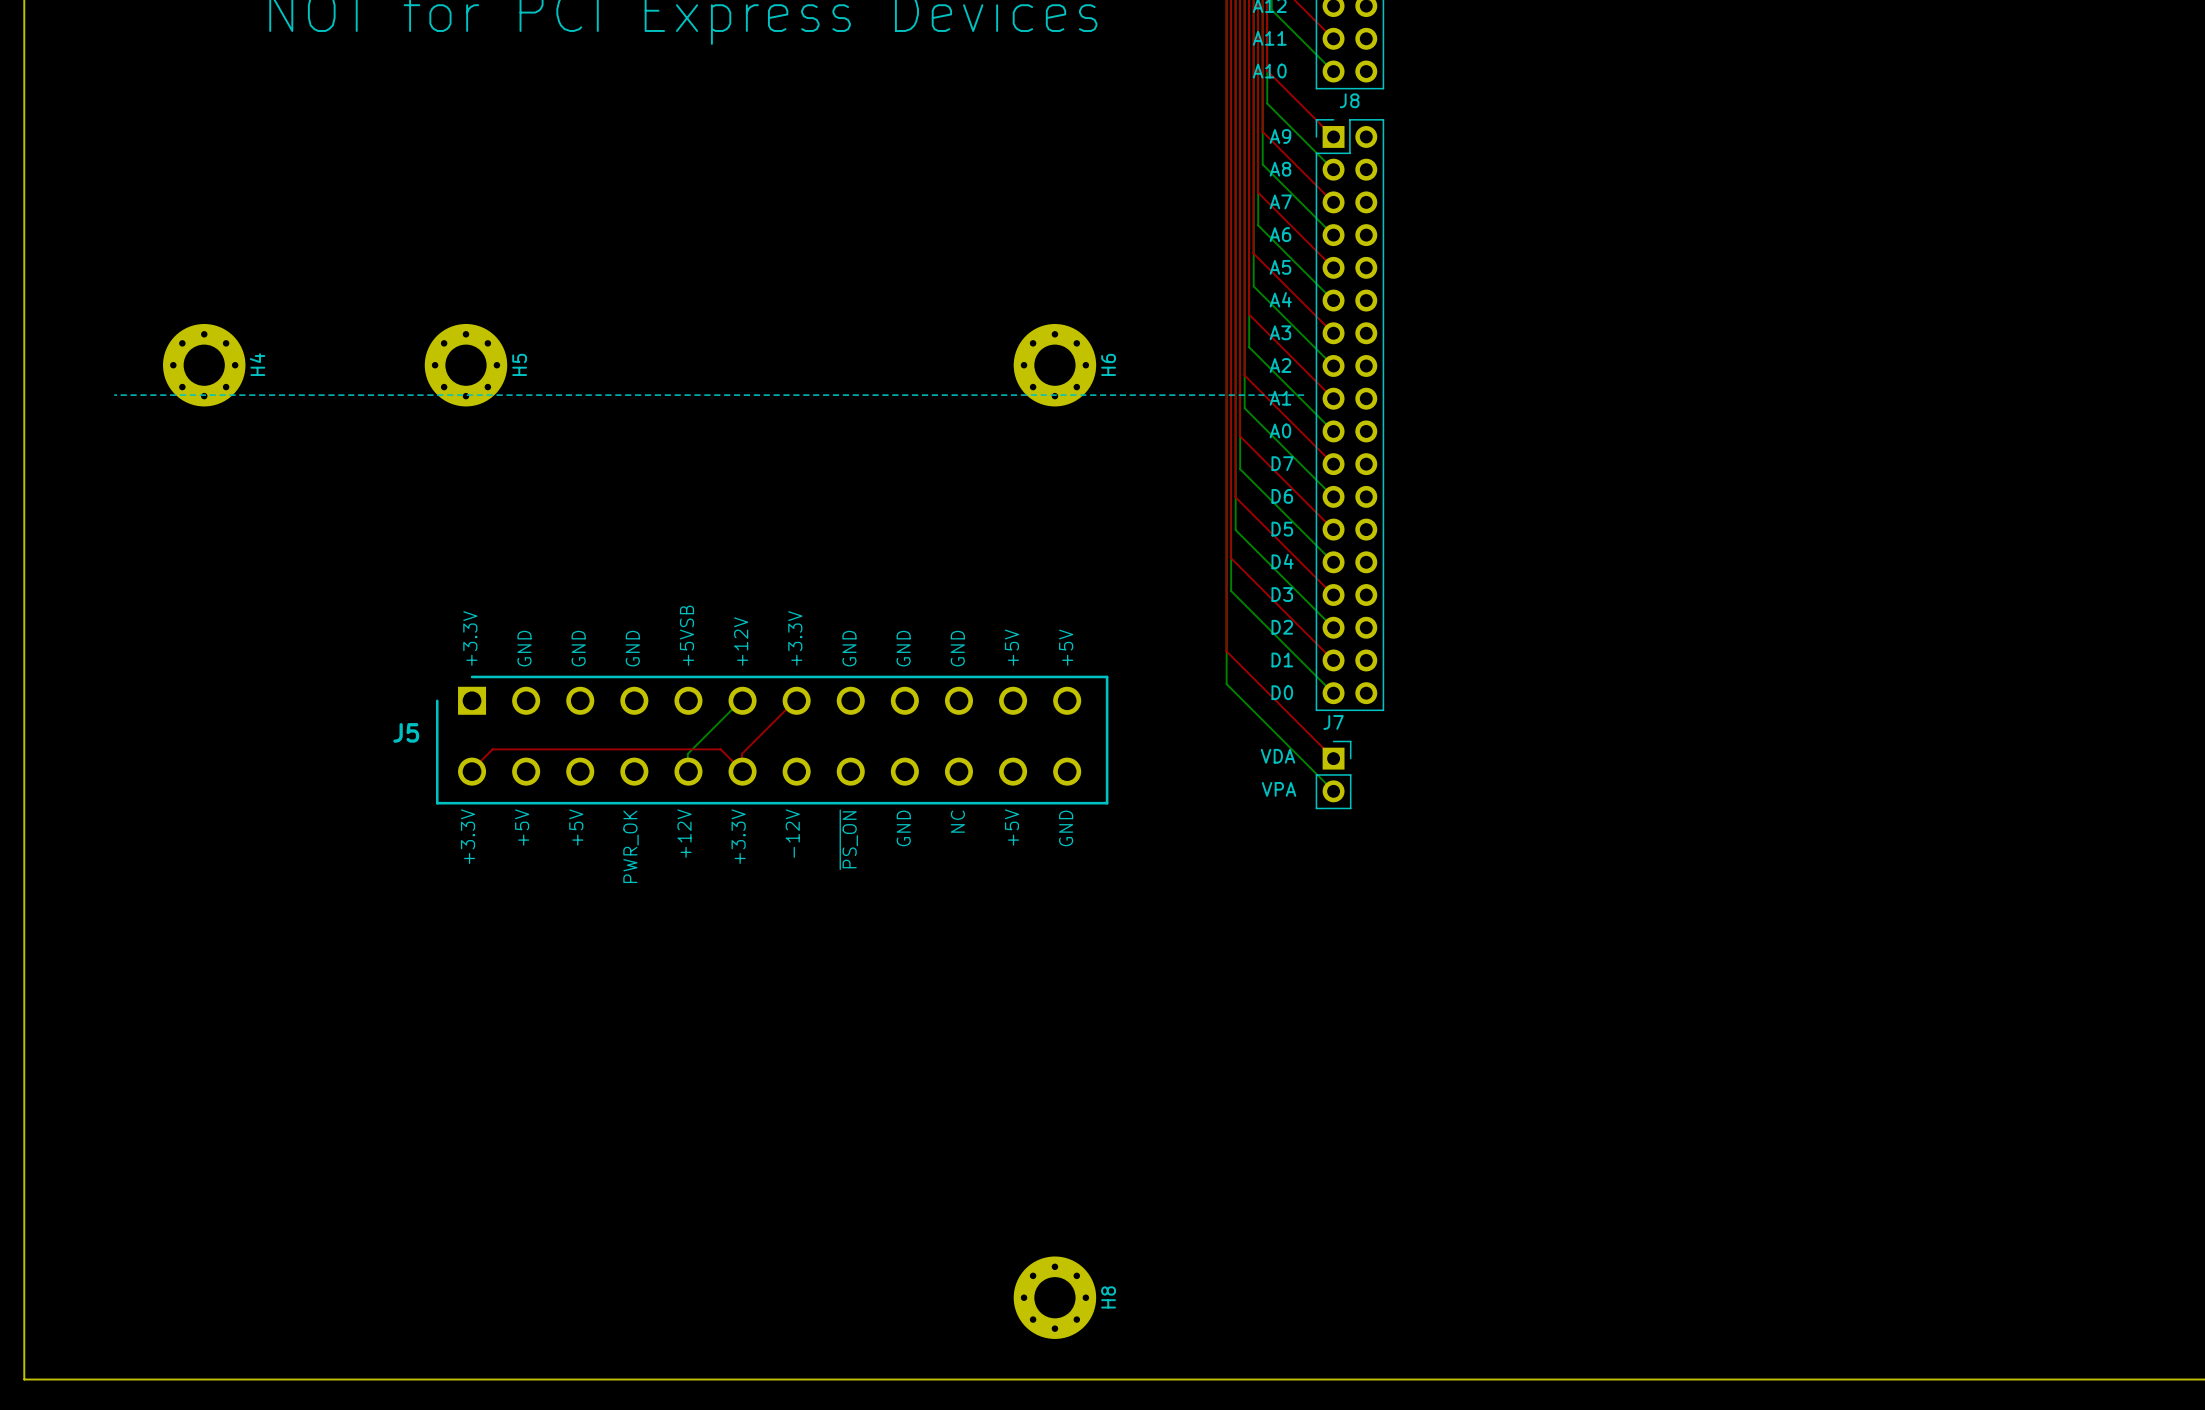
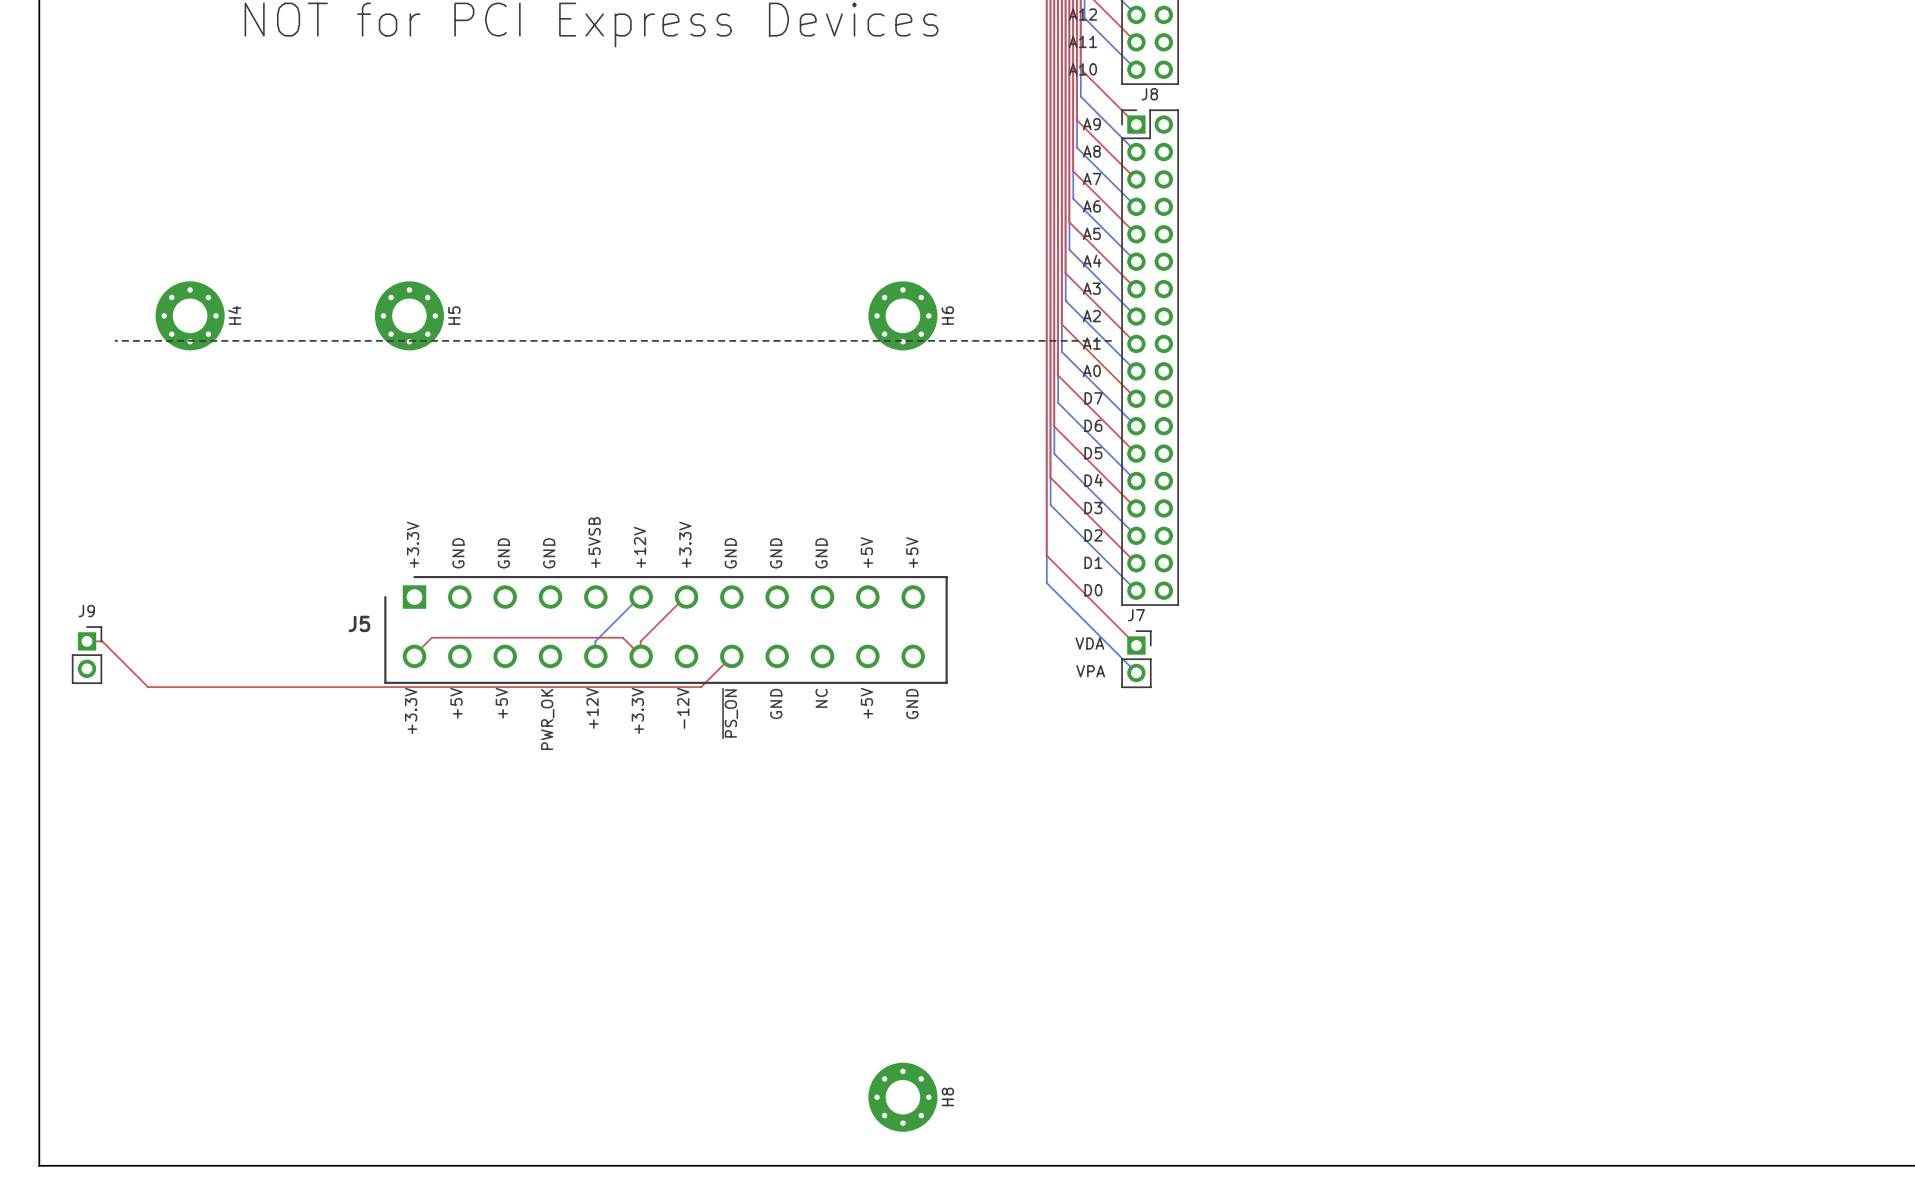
top track: none -> (87, 641) (102, 641) (148, 687) (701, 687) (731, 656)
J9: none -> (87, 655)

